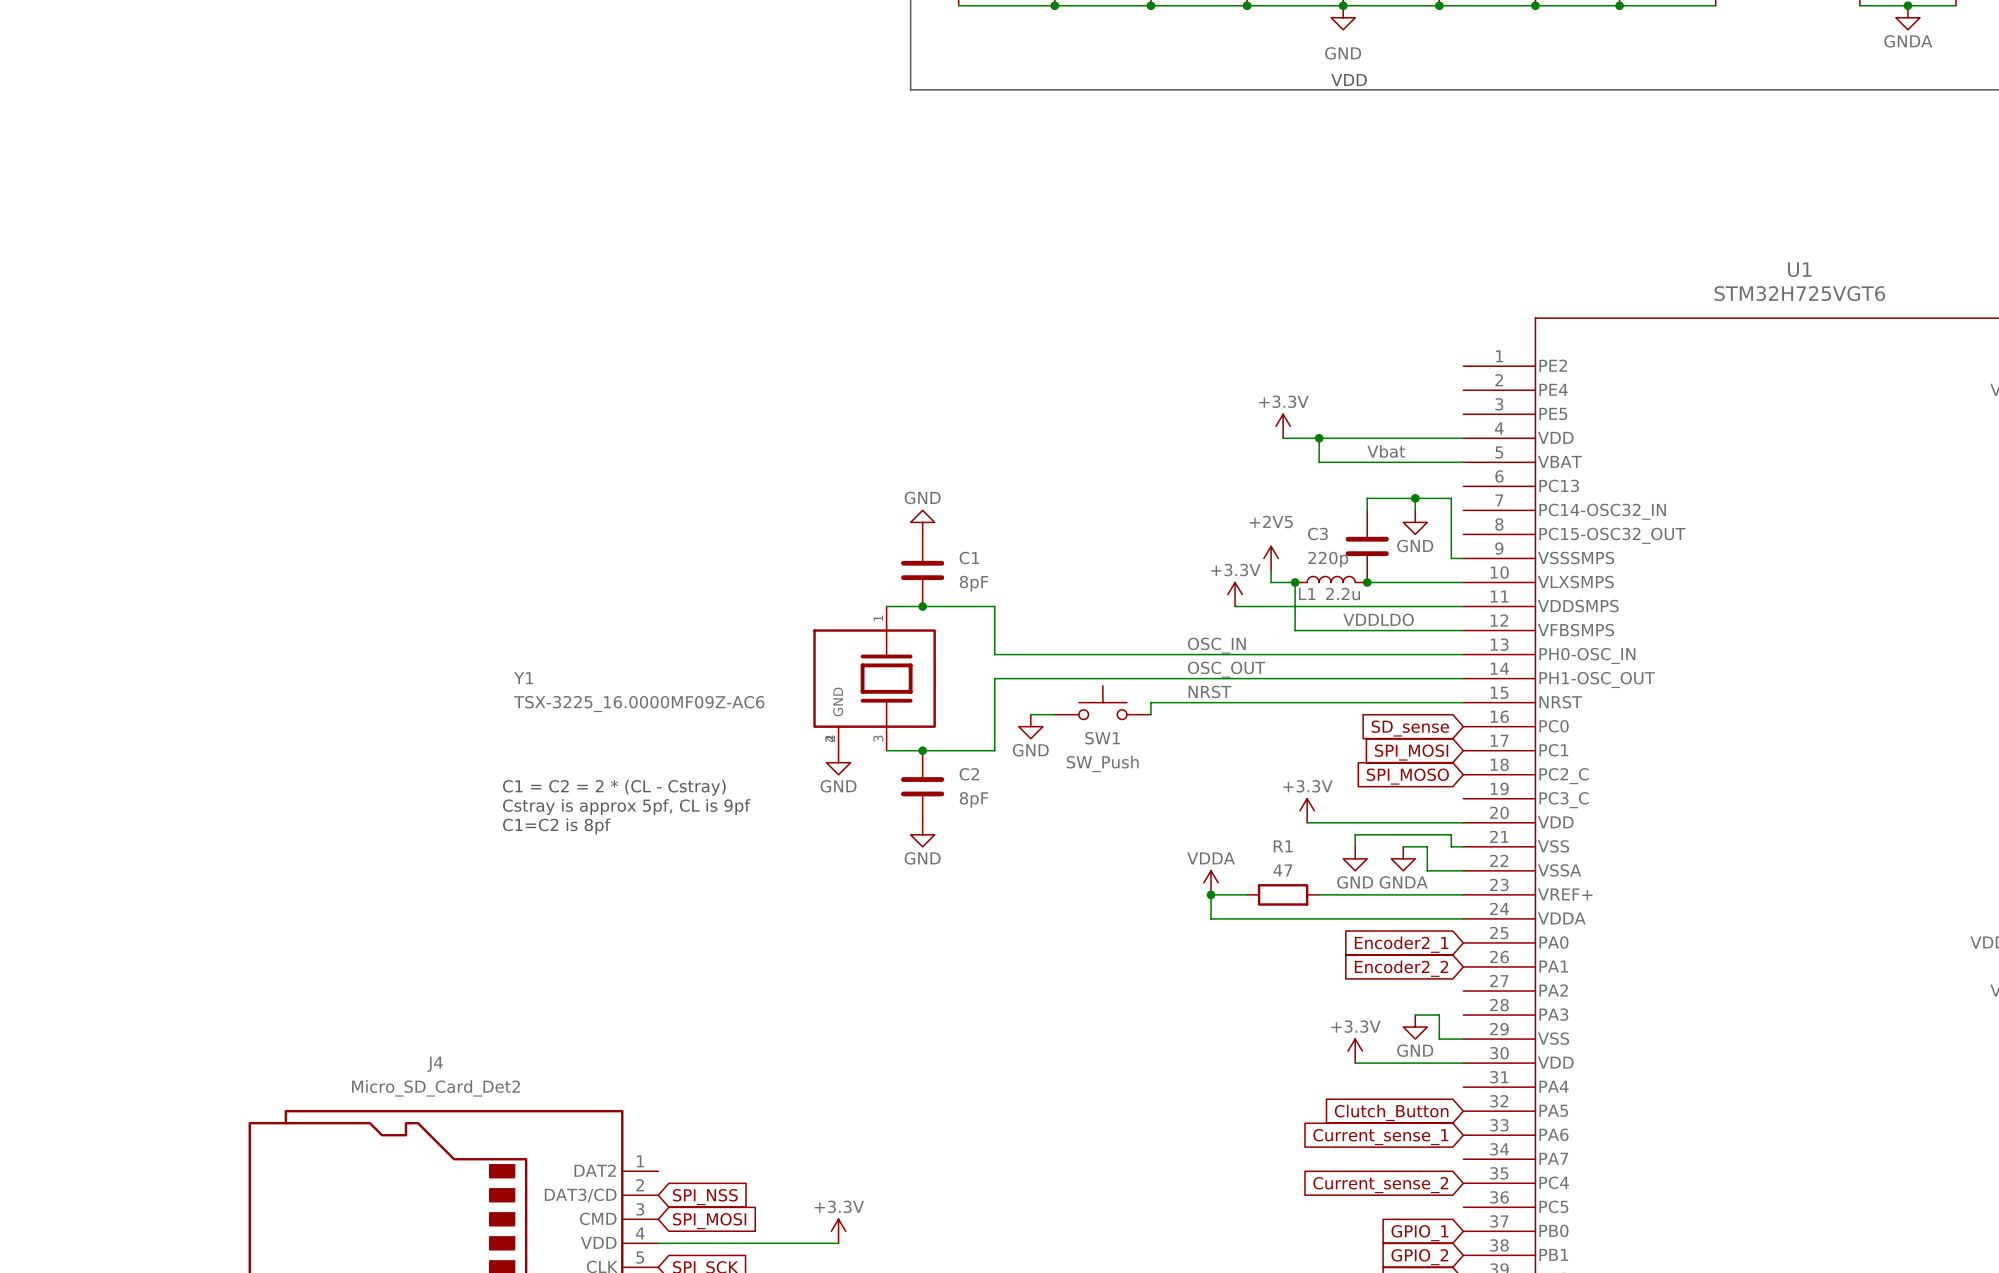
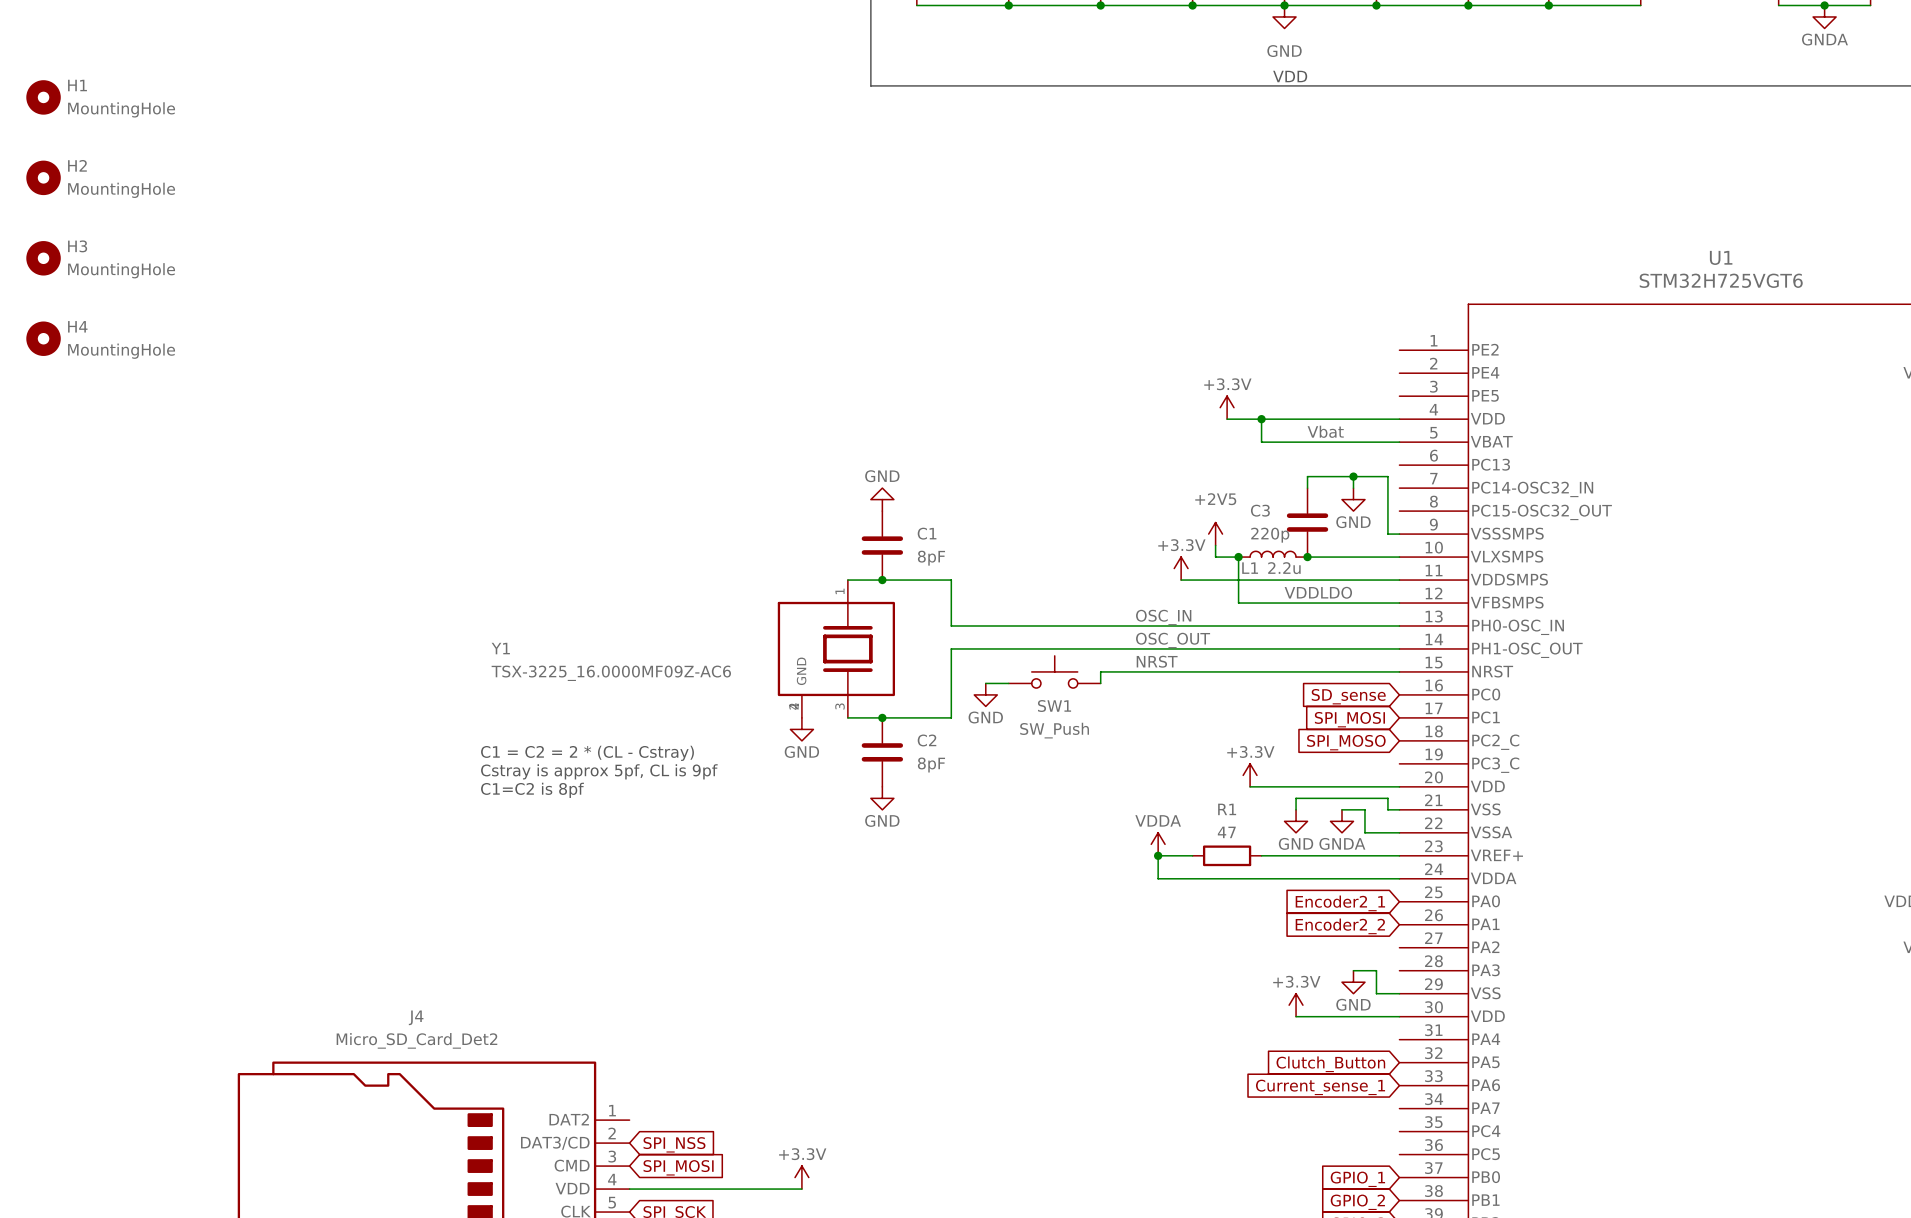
H1: none -> MountingHole (43, 97)
H2: none -> MountingHole (43, 177)
H3: none -> MountingHole (43, 258)
H4: none -> MountingHole (43, 338)
global label: Current_sense_2 (1380, 1185) -> none

